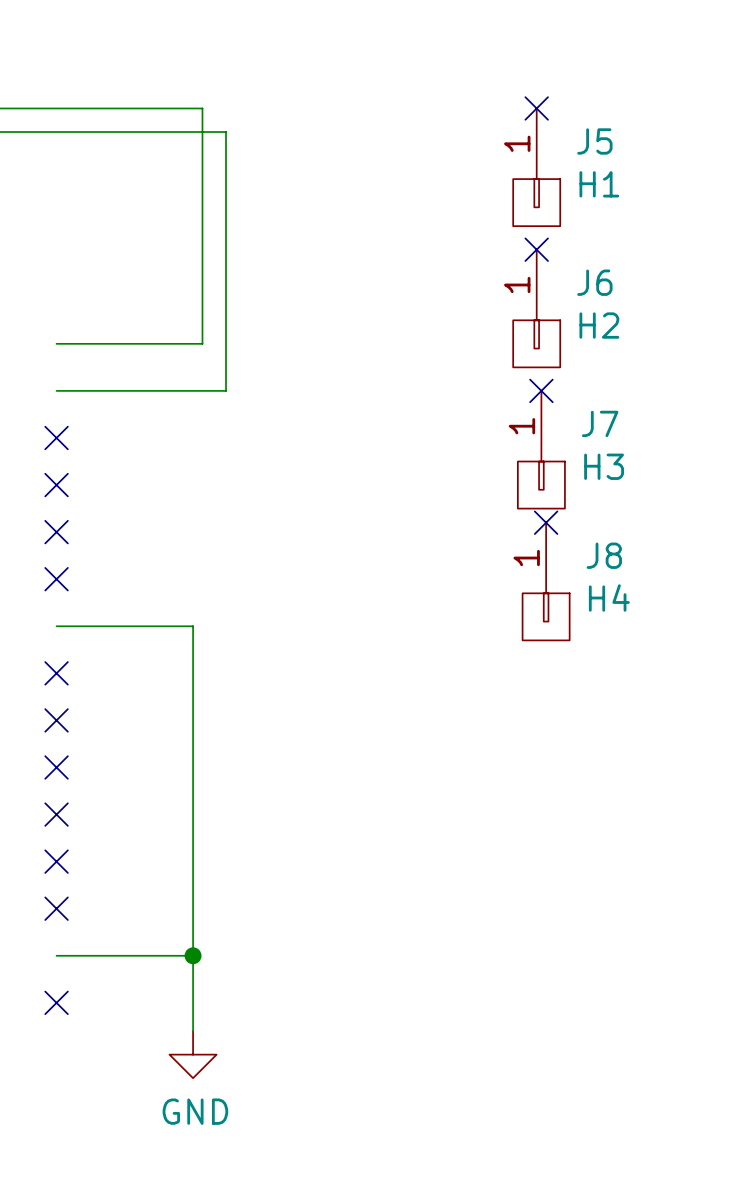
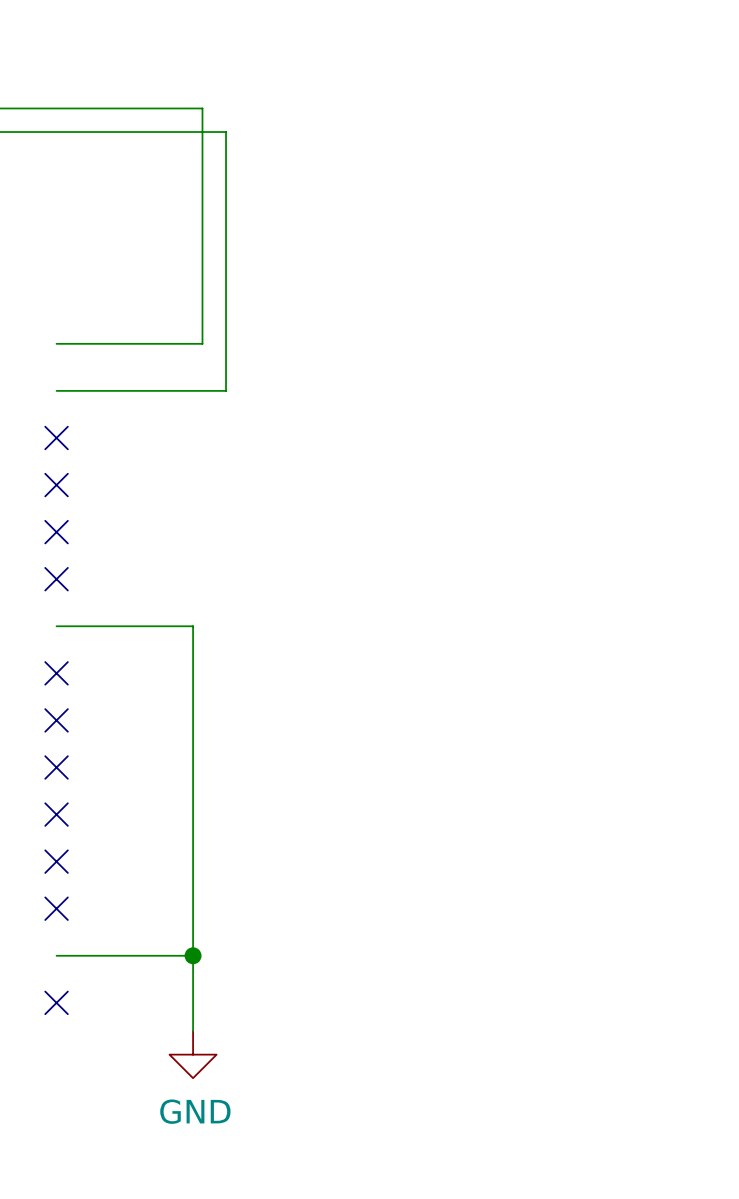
no-connect mark: (536, 108) -> none
J5: H1 (536, 167) -> none
no-connect mark: (536, 249) -> none
J6: H2 (536, 308) -> none
no-connect mark: (541, 390) -> none
J7: H3 (541, 449) -> none
no-connect mark: (546, 522) -> none
J8: H4 (546, 581) -> none

